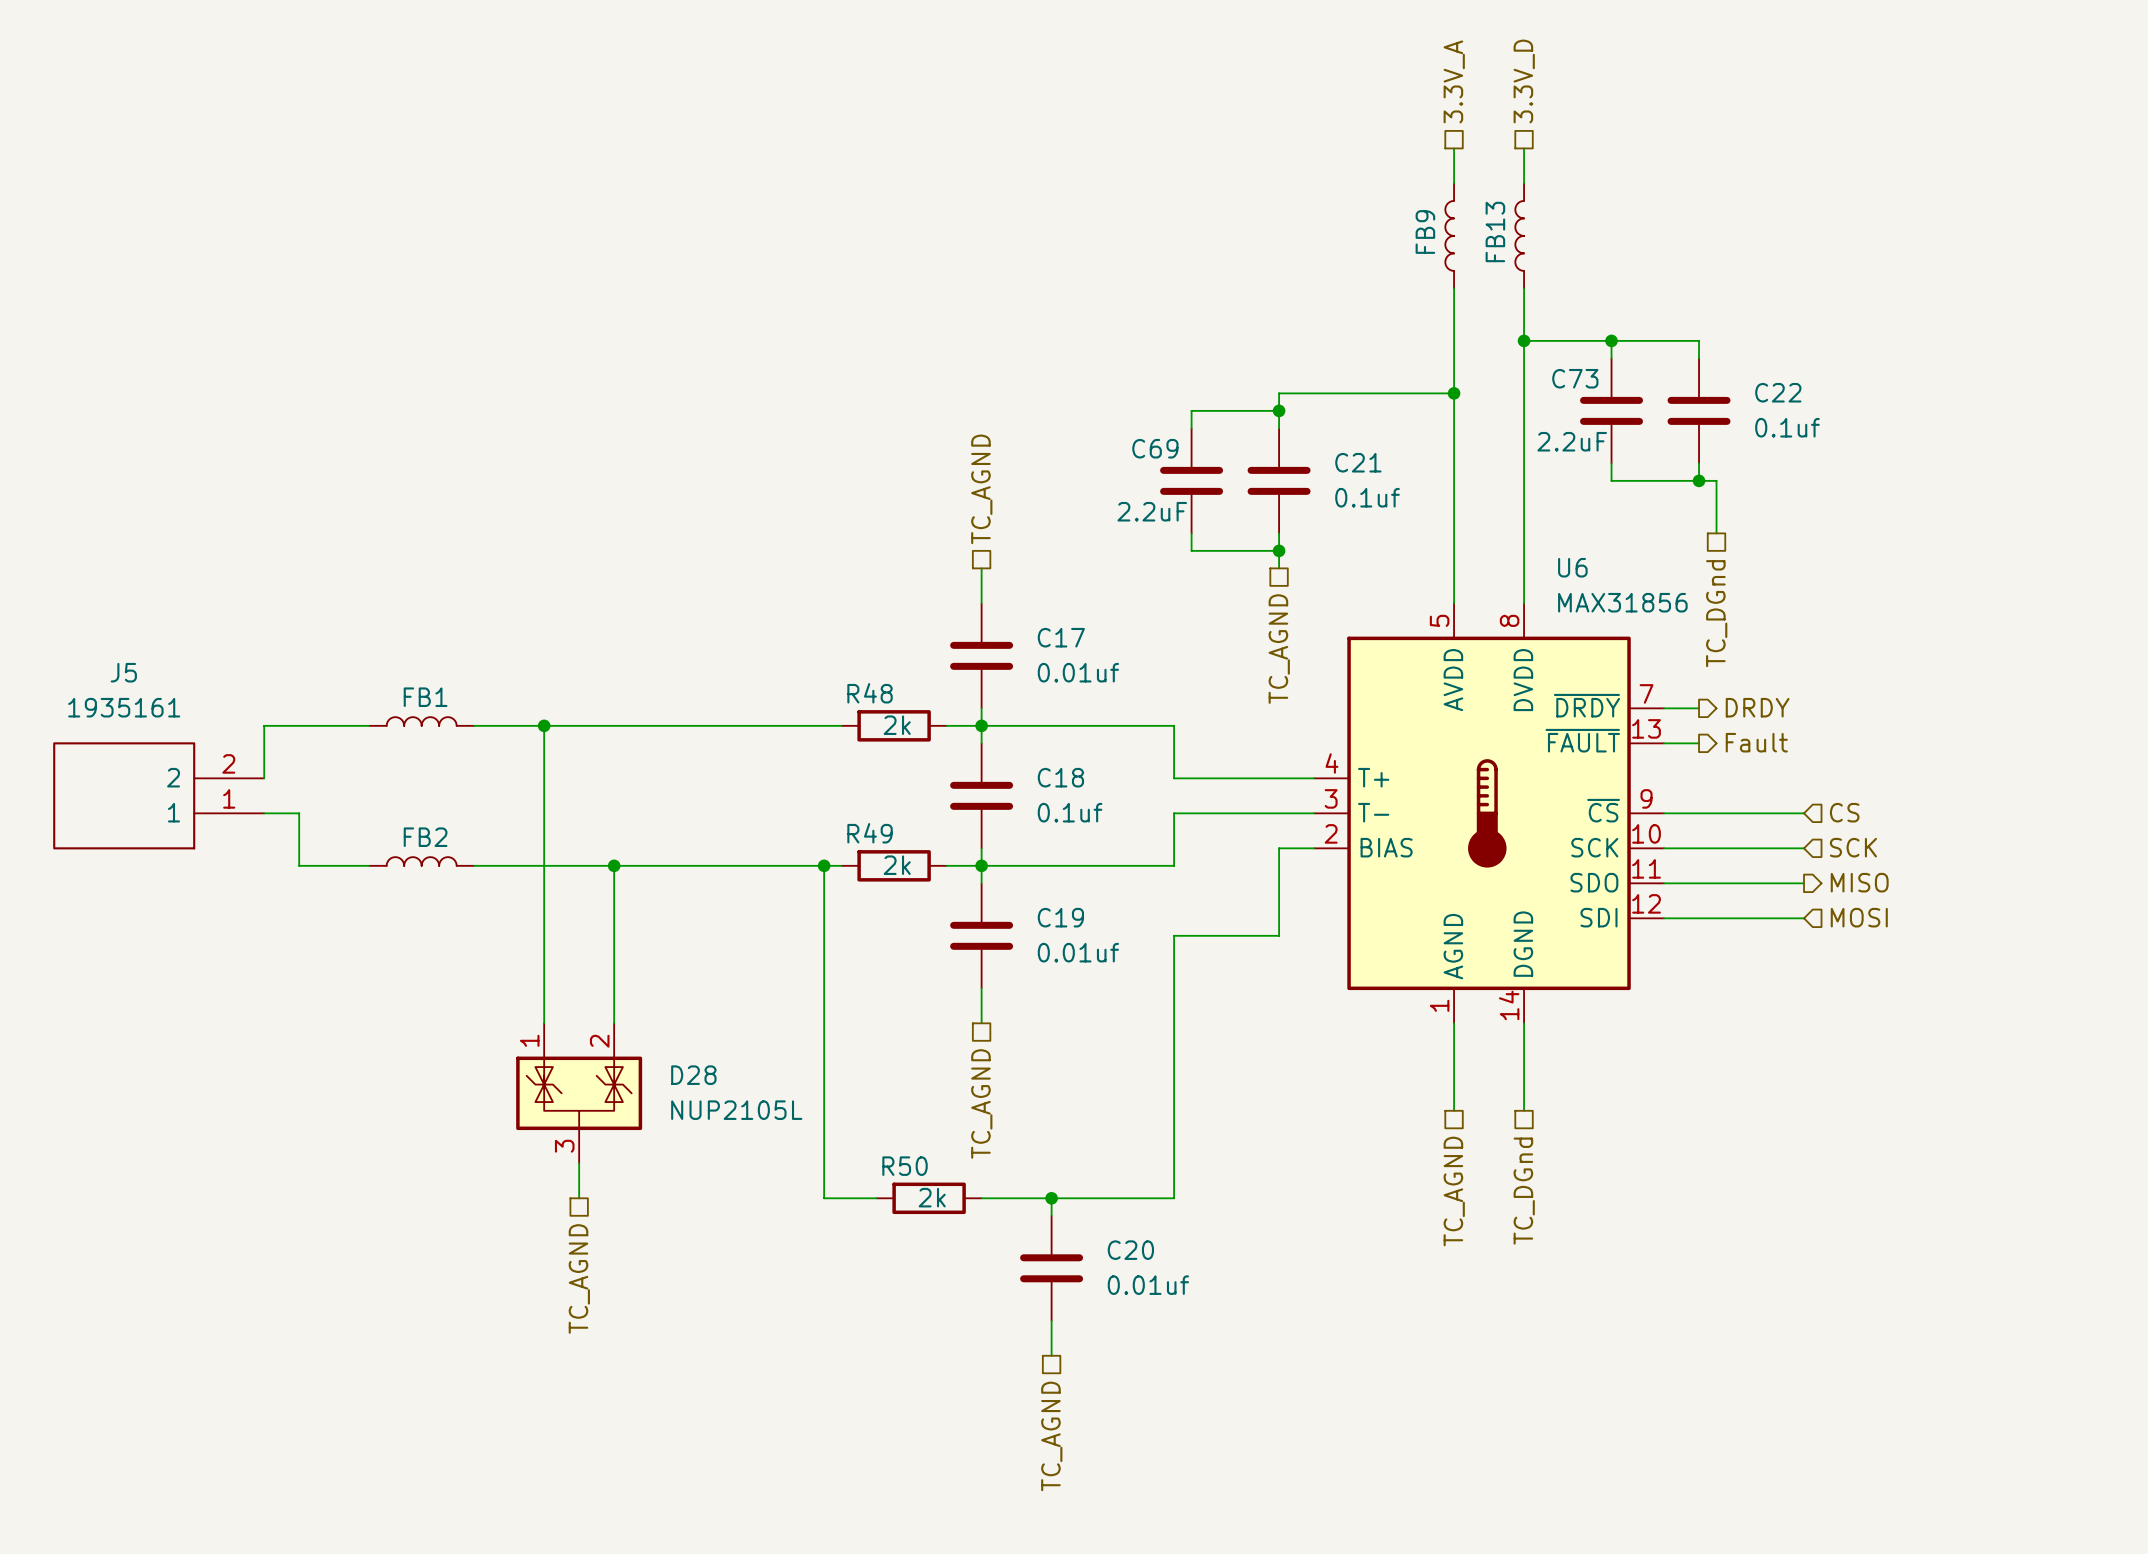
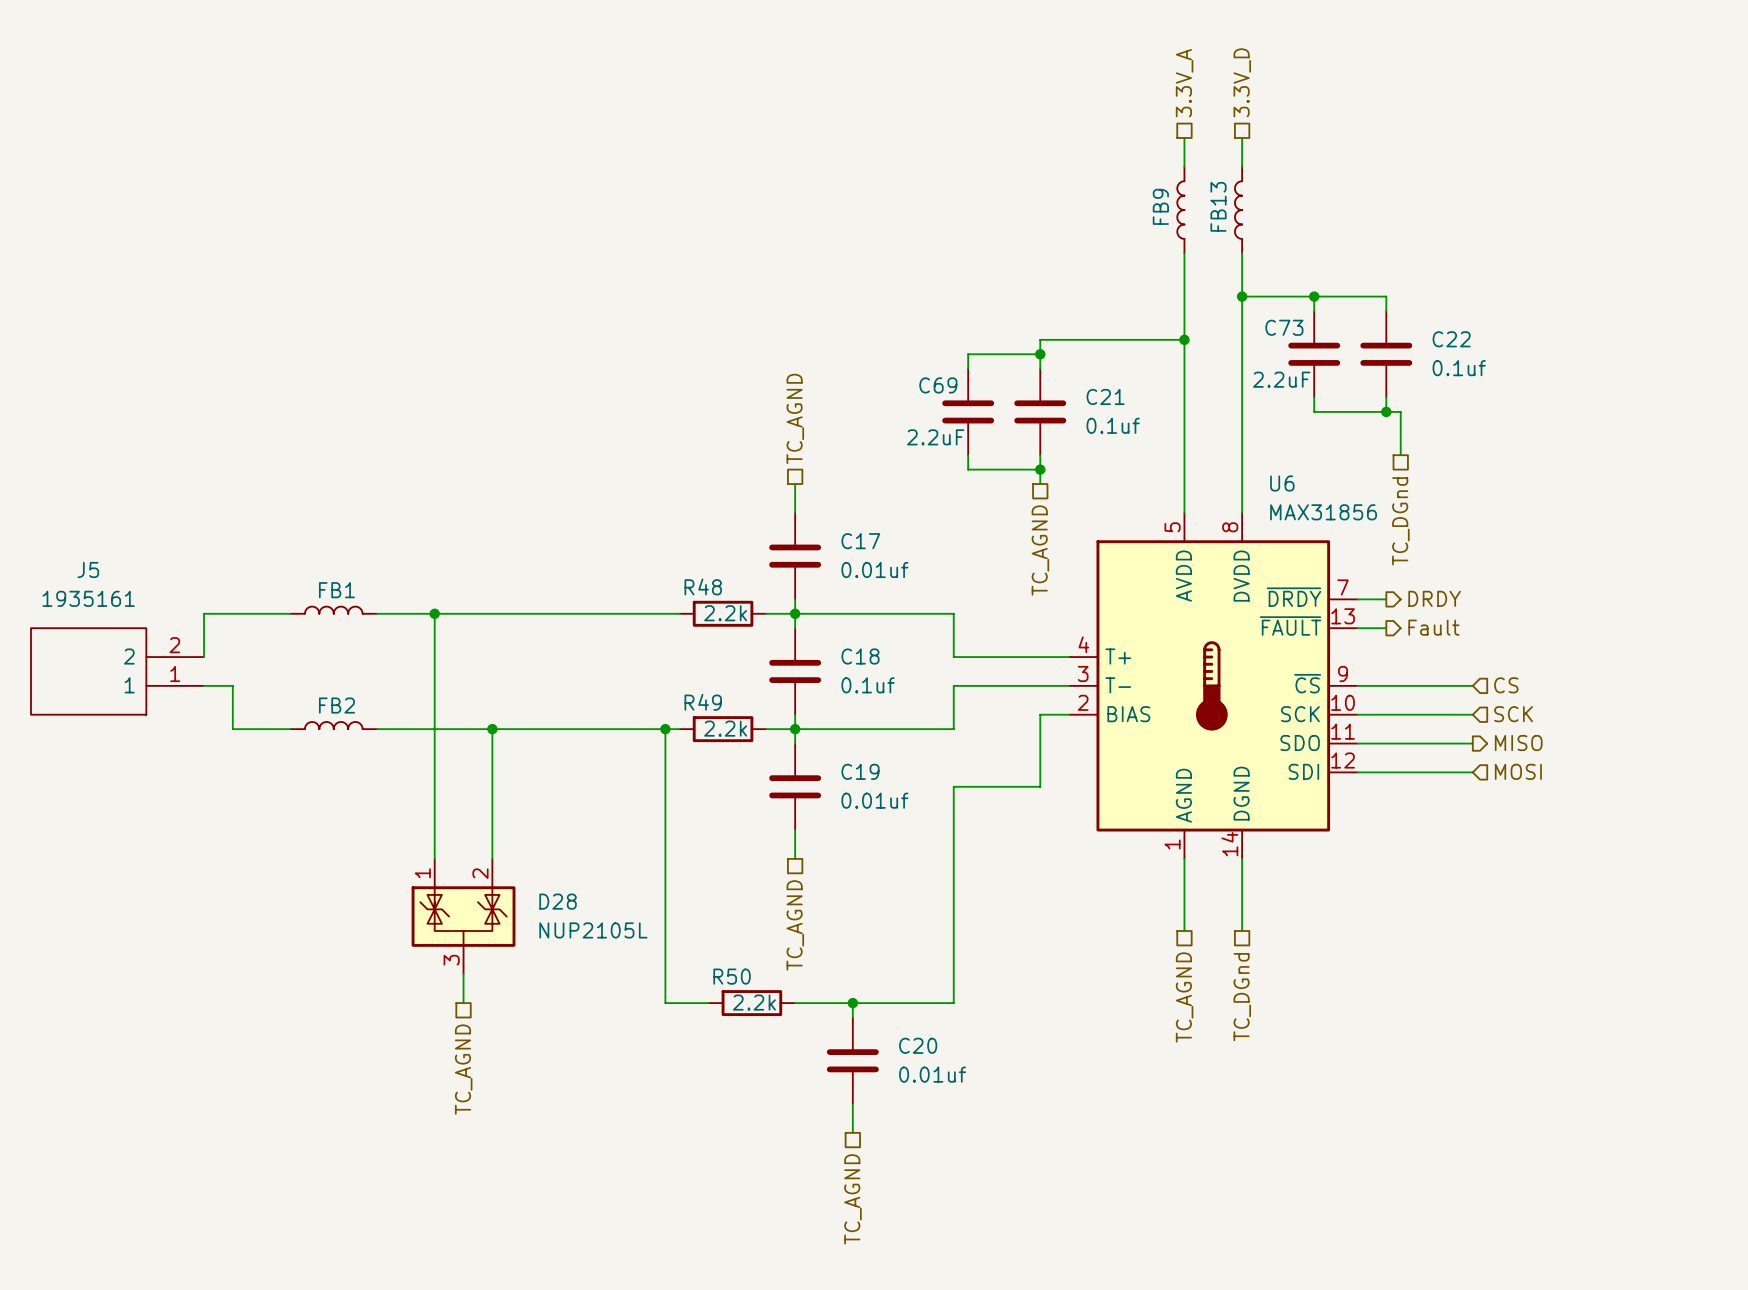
R48 value: 2k (897, 725) -> 2.2k (725, 613)
R49 value: 2k (897, 865) -> 2.2k (725, 728)
R50 value: 2k (932, 1197) -> 2.2k (754, 1002)

